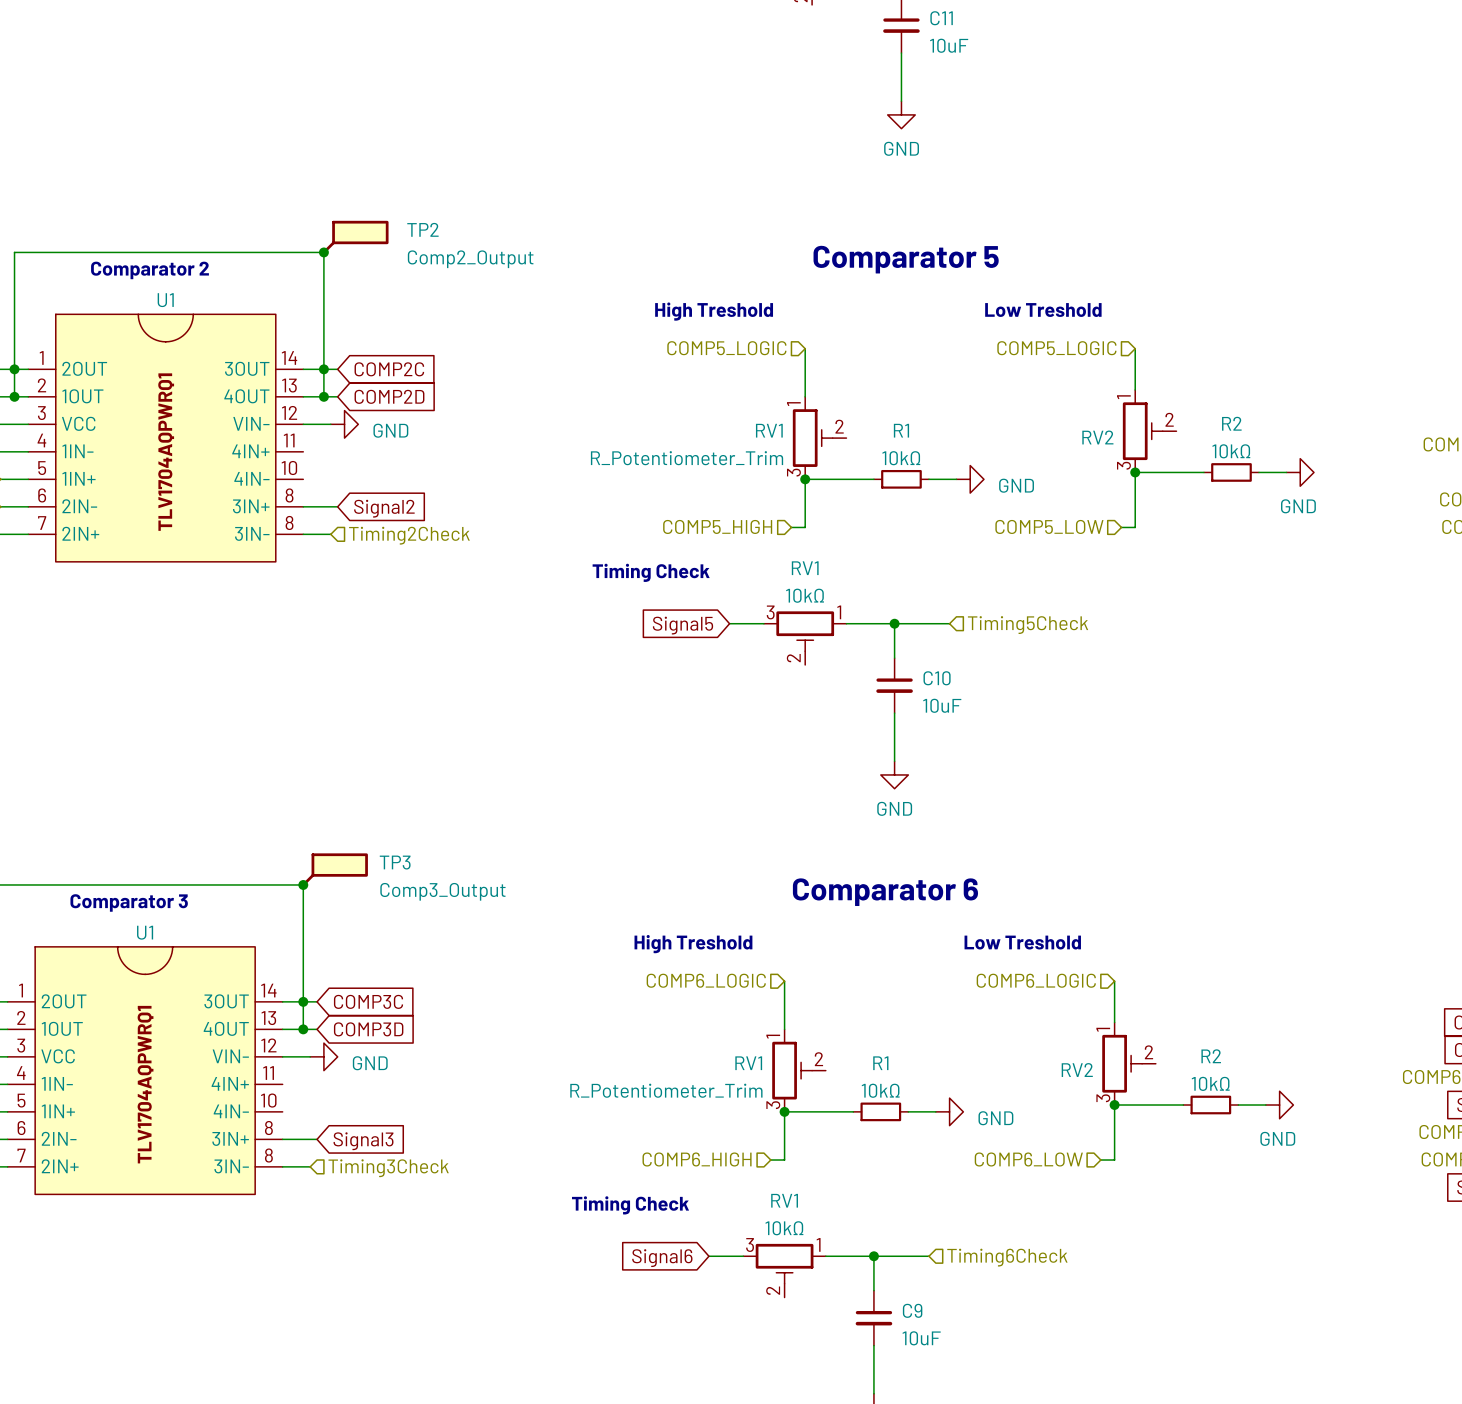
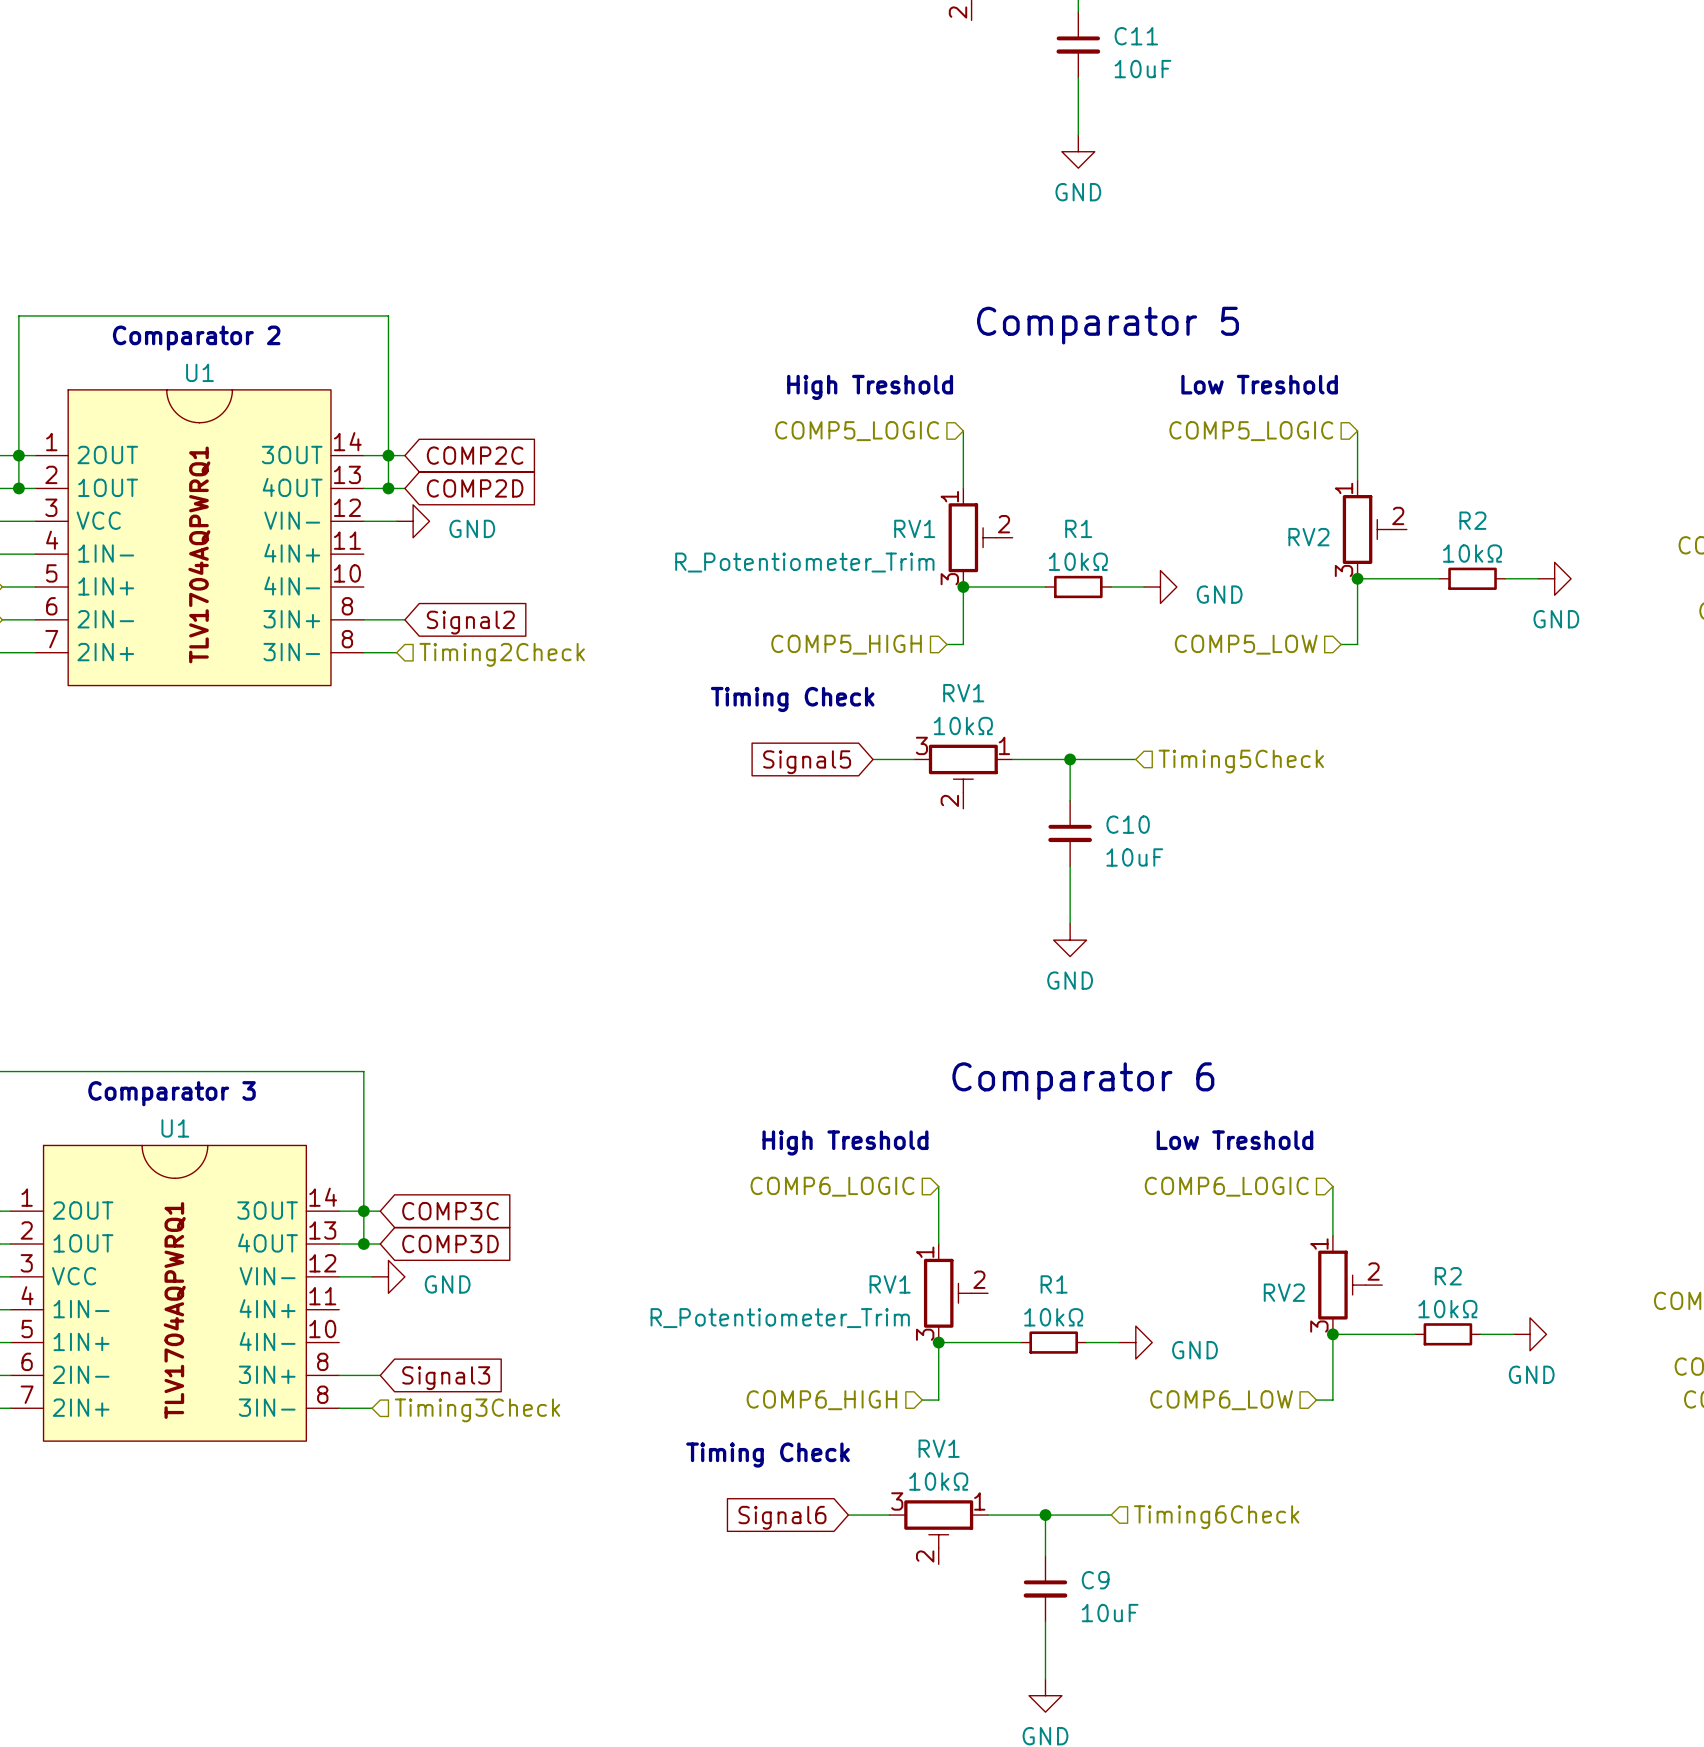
TP2: Comp2_Output (355, 237) -> none
junction: (323, 252) -> none
TP3: Comp3_Output (334, 869) -> none
junction: (303, 884) -> none

